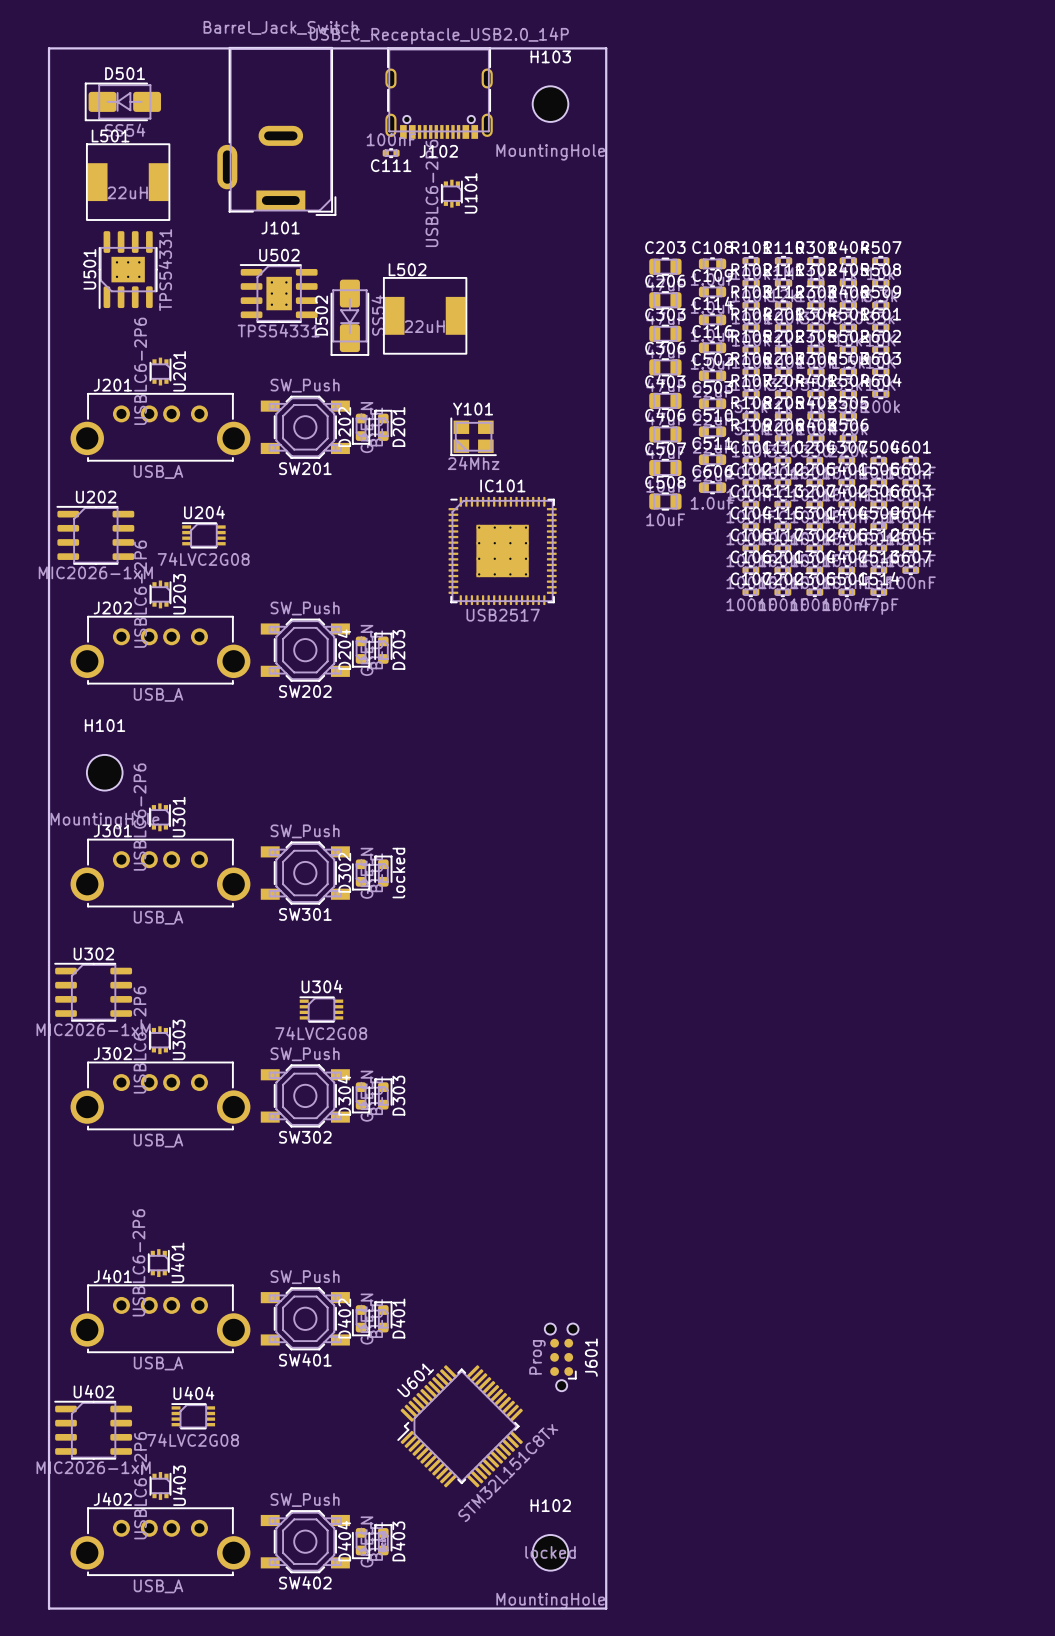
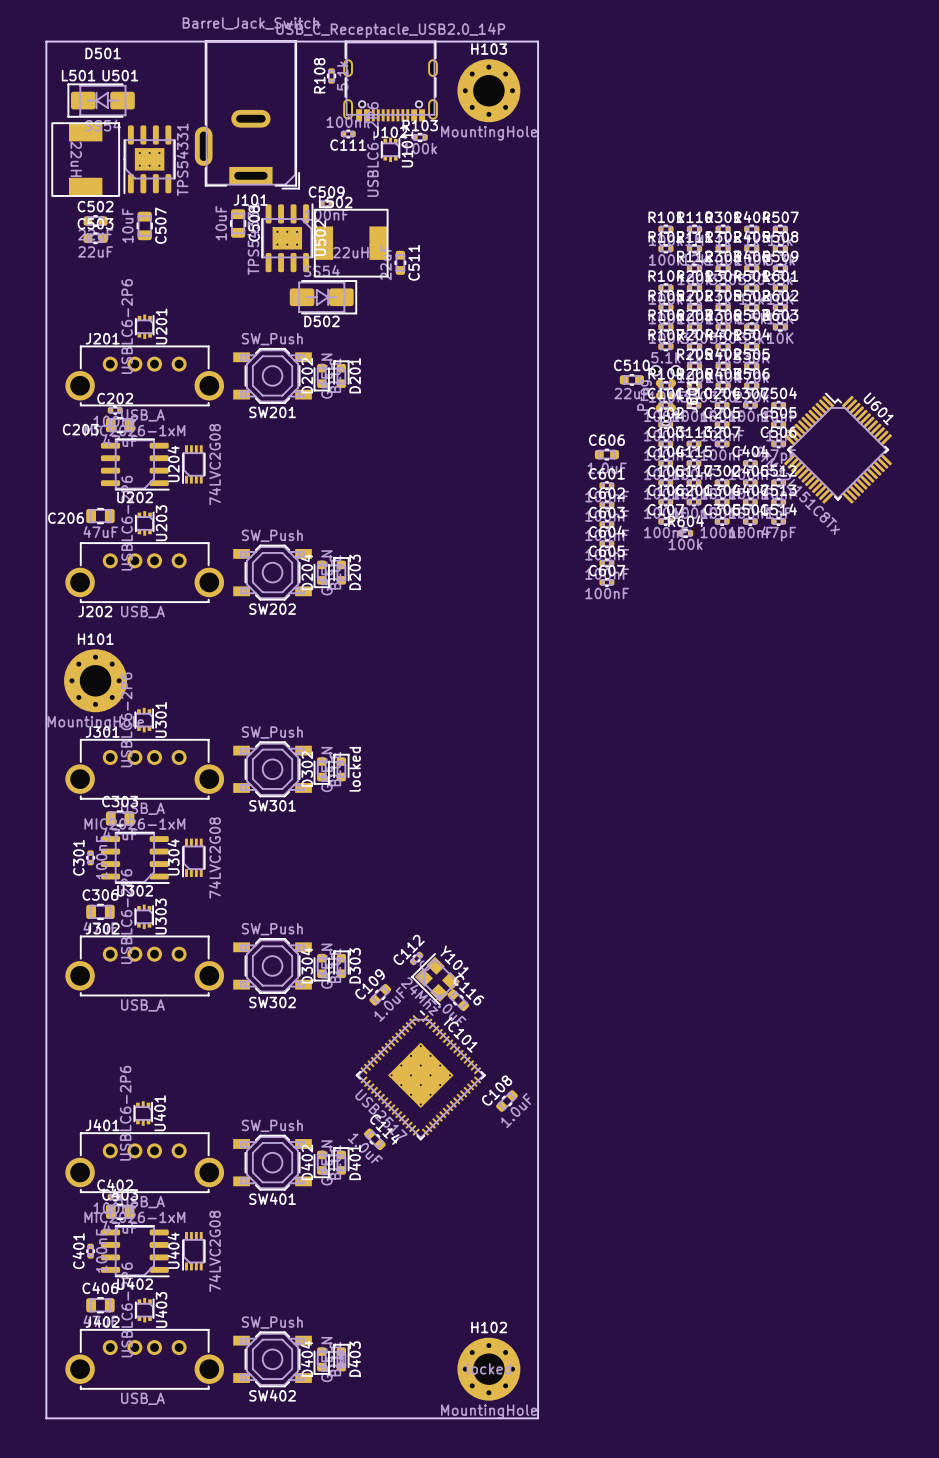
D501 name position: D501 (125, 73) -> D501 (103, 53)
H103 footprint: [532, 86, 569, 122] -> [457, 59, 521, 123]
D501 position: (123, 101) -> (101, 100)
L501 name position: L501 (110, 136) -> L501 (78, 75)
L501 rotation: 0° (128, 182) -> 90° clockwise (85, 159)
U101 position: (451, 193) -> (390, 149)
C203 name position: C203 (665, 247) -> C203 (80, 429)
C108 rotation: 0° (712, 263) -> 45° counterclockwise (507, 1101)
C108 position: (712, 263) -> (507, 1101)
C203 position: (665, 266) -> (120, 425)
U501 name rotation: 0° (89, 269) -> 90° clockwise (120, 75)
U501 name position: U501 (89, 269) -> U501 (120, 75)
U501 position: (128, 269) -> (149, 159)
C206 name position: C206 (665, 281) -> C206 (66, 518)
C109 rotation: 0° (712, 291) -> 45° counterclockwise (380, 994)
C109 position: (712, 291) -> (380, 994)
U502 rotation: 0° (278, 293) -> 90° clockwise (287, 237)
U502 position: (278, 293) -> (287, 237)
C206 position: (665, 300) -> (100, 516)
R103 position: (751, 305) -> (420, 137)
L502 position: (425, 315) -> (351, 243)
D502 rotation: 0° (349, 317) -> 90° counterclockwise (323, 297)
C114 rotation: 0° (712, 319) -> 45° clockwise (374, 1139)
C114 position: (712, 319) -> (374, 1139)
C303 position: (665, 333) -> (120, 818)
C116 rotation: 0° (712, 347) -> 45° clockwise (458, 1000)
C116 position: (712, 347) -> (458, 1000)
C306 position: (665, 367) -> (100, 911)
C502 position: (712, 375) -> (95, 221)
R604 position: (880, 394) -> (685, 533)
C403 position: (665, 400) -> (120, 1211)
C503 position: (712, 403) -> (95, 238)
R108 rotation: 0° (751, 416) -> 90° clockwise (331, 75)
R108 position: (751, 416) -> (331, 75)
C406 position: (665, 434) -> (100, 1305)
Y101 rotation: 0° (473, 436) -> 45° clockwise (435, 979)
Y101 position: (473, 436) -> (435, 979)
C511 rotation: 0° (712, 459) -> 90° clockwise (400, 262)
C511 position: (712, 459) -> (400, 262)
C601 position: (910, 460) -> (606, 485)
C507 rotation: 0° (665, 467) -> 90° clockwise (144, 225)
C507 position: (665, 467) -> (144, 225)
C112 rotation: 0° (782, 482) -> 45° counterclockwise (416, 958)
C112 position: (782, 482) -> (416, 958)
C401 rotation: 0° (846, 482) -> 90° clockwise (90, 1251)
C401 position: (846, 482) -> (90, 1251)
C602 position: (910, 482) -> (606, 504)
C606 position: (712, 487) -> (606, 454)
C508 rotation: 0° (665, 501) -> 90° clockwise (238, 223)
C508 position: (665, 501) -> (238, 223)
C402 position: (846, 504) -> (115, 1197)
C603 position: (910, 504) -> (606, 524)
C301 rotation: 0° (814, 526) -> 90° clockwise (90, 857)
C301 position: (814, 526) -> (90, 857)
C509 position: (878, 526) -> (326, 203)
C604 position: (910, 526) -> (606, 543)
U202 rotation: 0° (95, 535) -> 180° (135, 464)
U202 position: (95, 535) -> (135, 464)
U204 rotation: 0° (203, 535) -> 90° counterclockwise (193, 464)
C605 position: (910, 548) -> (606, 563)
IC101 rotation: 0° (502, 550) -> 45° clockwise (420, 1075)
IC101 position: (502, 550) -> (420, 1075)
C607 position: (910, 570) -> (606, 582)
C202 position: (782, 592) -> (115, 410)
J202 name position: J202 (112, 607) -> J202 (95, 611)
H101 footprint: [86, 754, 123, 791] -> [64, 649, 128, 713]
U302 rotation: 0° (93, 992) -> 180° (135, 857)
U302 position: (93, 992) -> (135, 857)
U304 rotation: 0° (321, 1009) -> 90° counterclockwise (193, 857)
U304 position: (321, 1009) -> (193, 857)
J601 position: (561, 1357) -> (665, 395)
U404 rotation: 0° (193, 1416) -> 90° counterclockwise (193, 1251)
U601 rotation: 0° (460, 1426) -> 90° clockwise (838, 448)
U601 position: (460, 1426) -> (838, 448)
U402 rotation: 0° (93, 1430) -> 180° (135, 1251)
U402 position: (93, 1430) -> (135, 1251)
H102 footprint: [532, 1534, 569, 1571] -> [457, 1337, 521, 1401]

